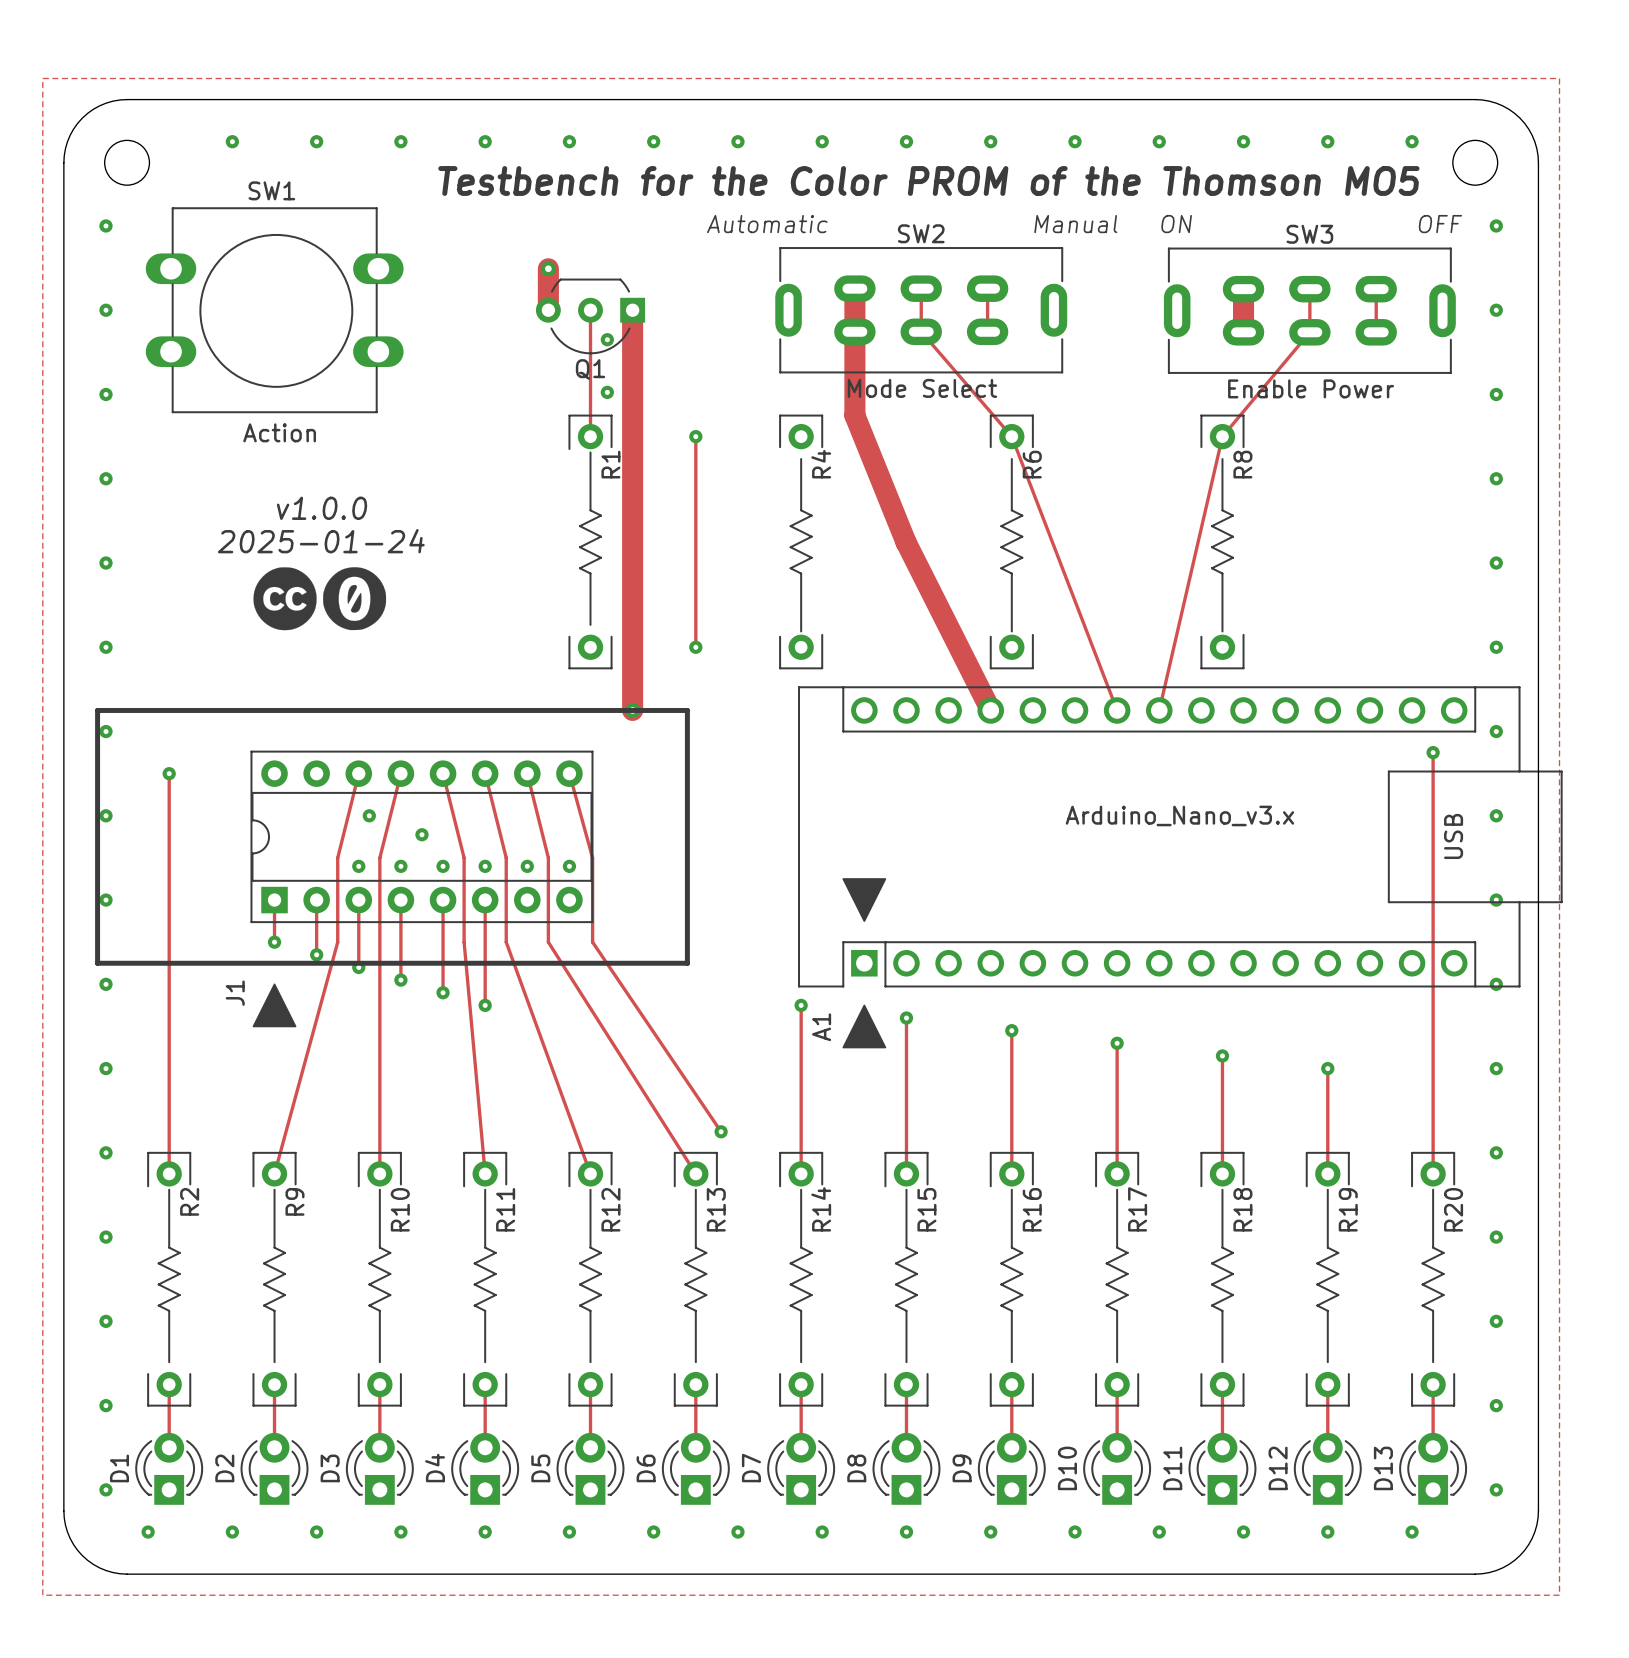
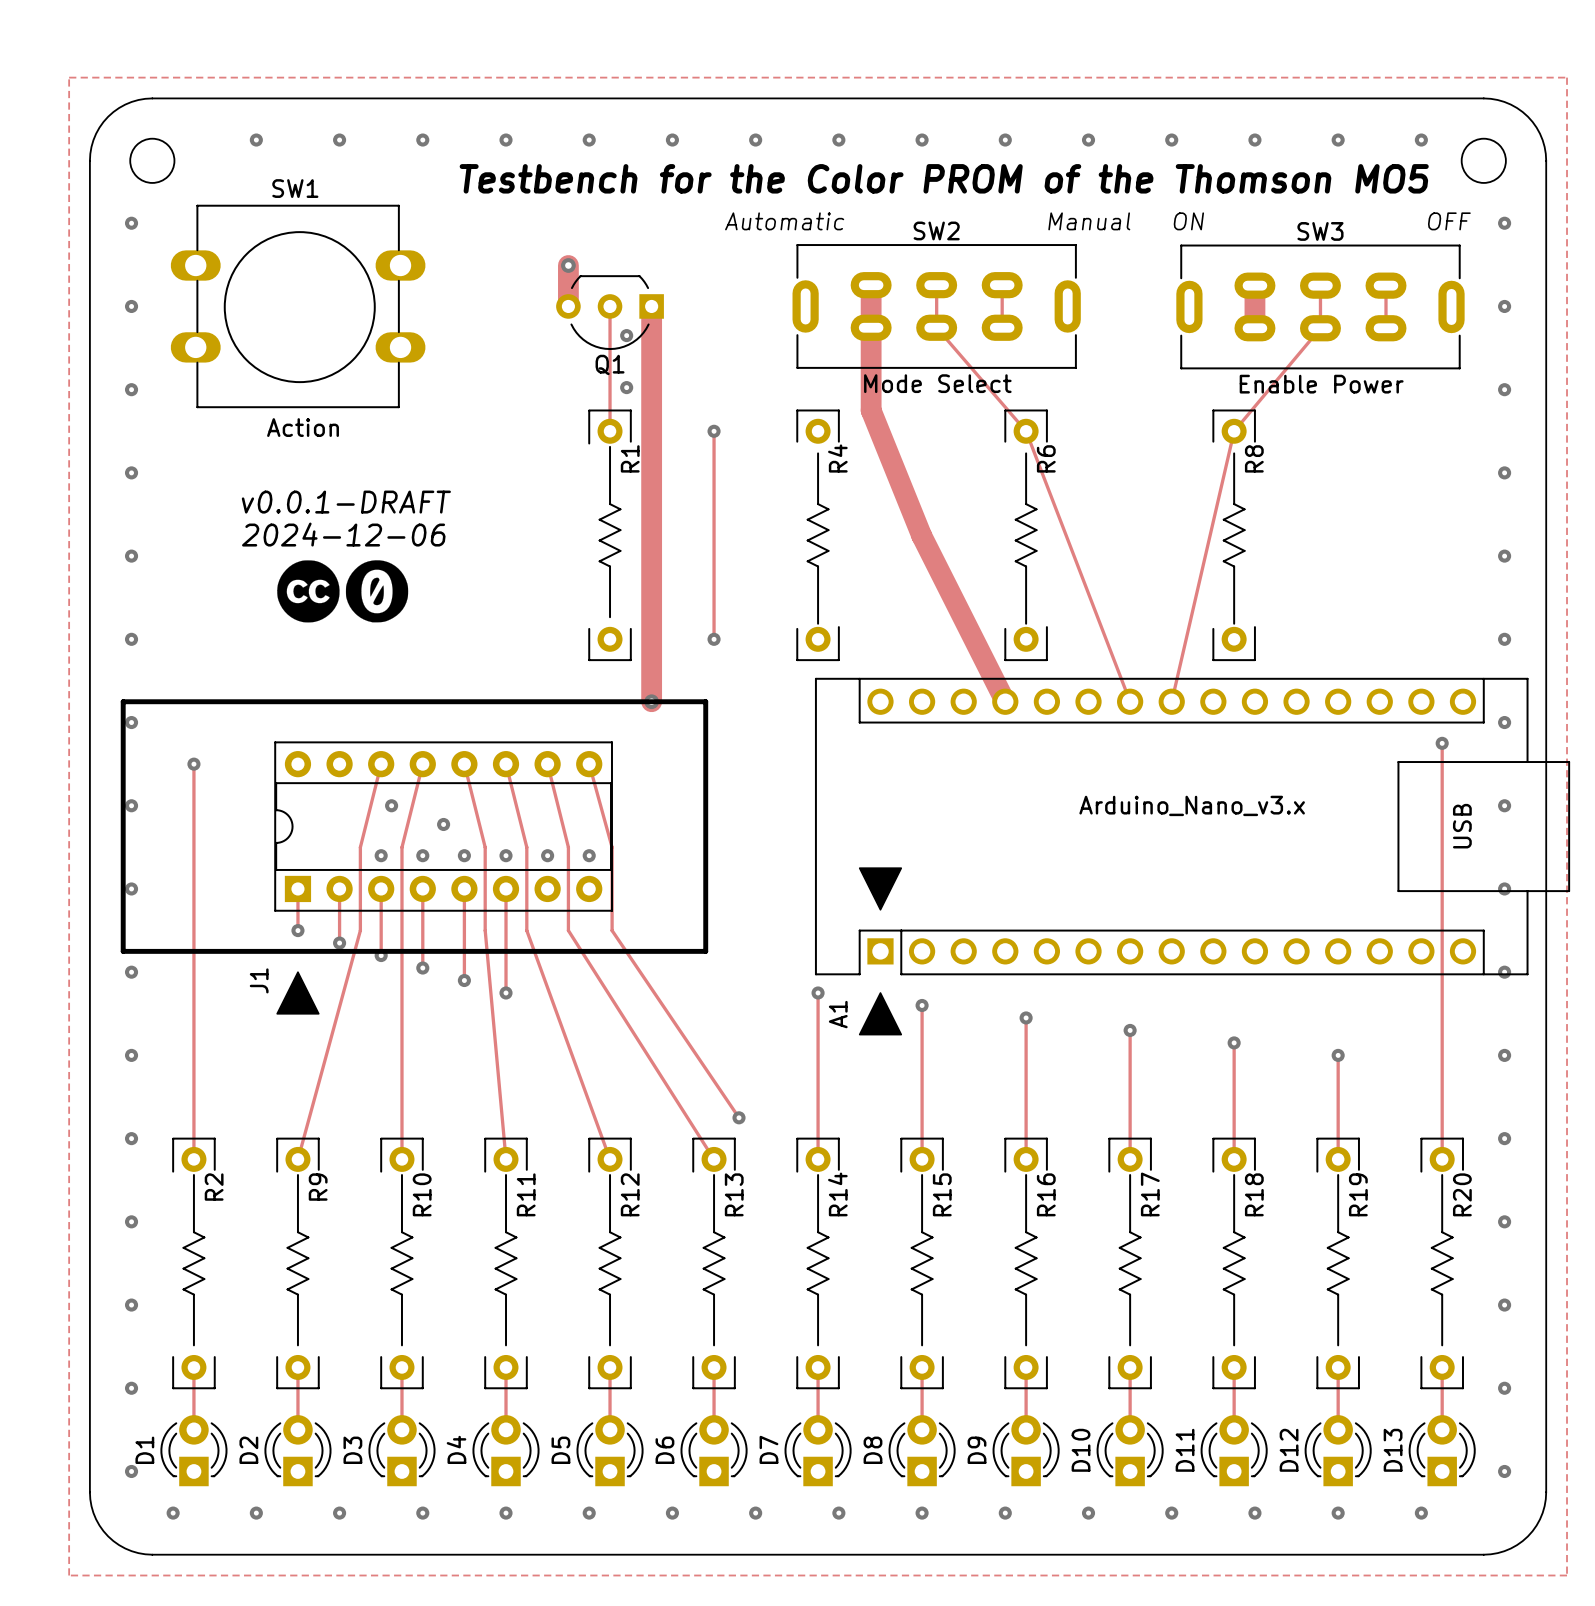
text: v1.0.0 (322, 508) -> v0.0.1-DRAFT (346, 502)
text: 2025-01-24 (321, 541) -> 2024-12-06 (343, 534)

